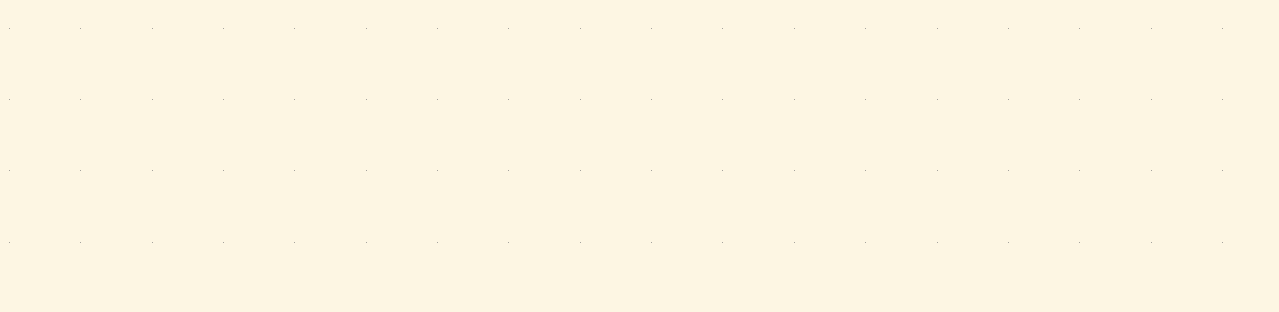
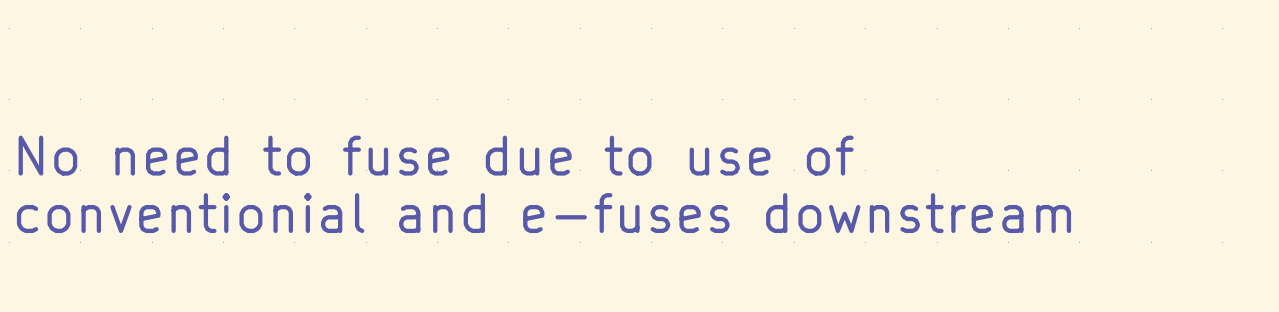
text: none -> No need to fuse due to use of (436, 155)
text: none -> conventionial and e-fuses downstream (543, 213)

